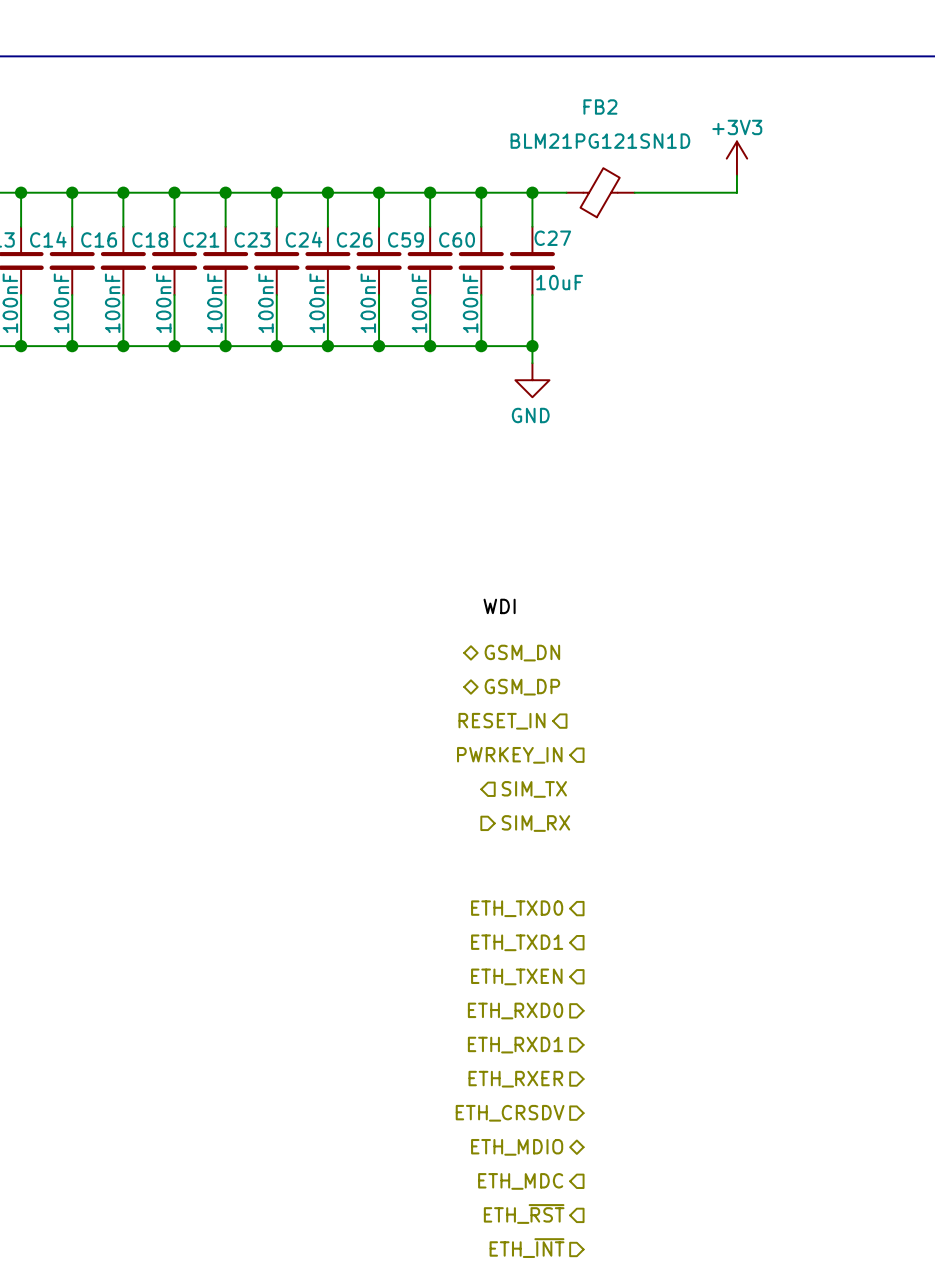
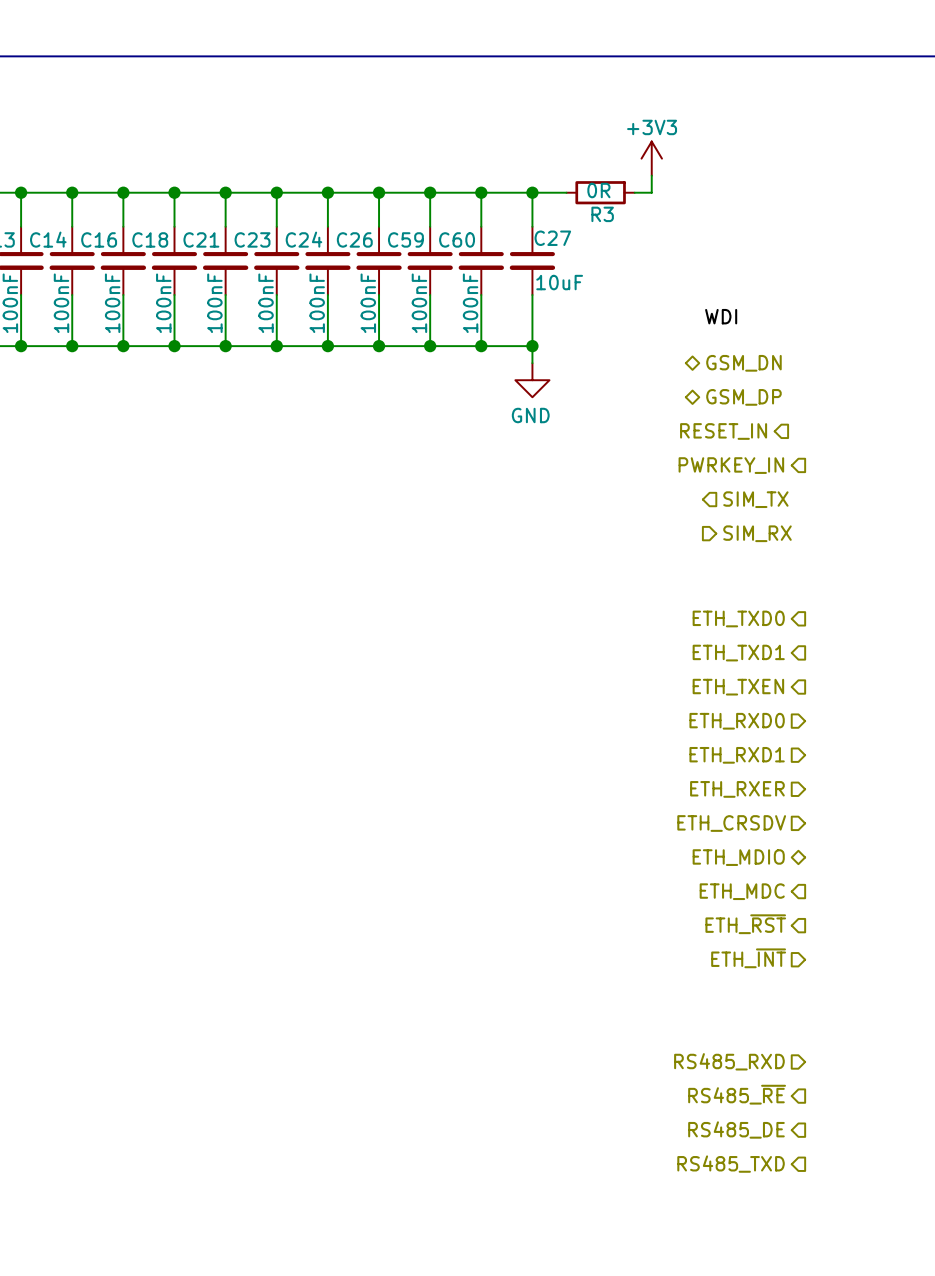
power symbol position: +3V3 (736, 158) -> +3V3 (651, 158)
wire: (736, 175) (736, 192) (651, 192) -> (651, 175) (651, 192)
FB2: BLM21PG121SN1D (600, 192) -> none
R3: none -> 0R (600, 192)
label: none -> WDI (721, 316)
hierarchical label: none -> GSM_DN (743, 363)
hierarchical label: none -> GSM_DP (743, 397)
hierarchical label: none -> RESET_IN (723, 431)
hierarchical label: none -> PWRKEY_IN (731, 465)
hierarchical label: none -> SIM_TX (755, 499)
hierarchical label: none -> SIM_RX (757, 533)
label: WDI (499, 606) -> none
hierarchical label: none -> ETH_TXD0 (738, 618)
hierarchical label: GSM_DN (522, 653) -> none
hierarchical label: none -> ETH_TXD1 (738, 653)
hierarchical label: GSM_DP (522, 687) -> none
hierarchical label: none -> ETH_TXEN (738, 687)
hierarchical label: RESET_IN (502, 721) -> none
hierarchical label: none -> ETH_RXD0 (737, 721)
hierarchical label: PWRKEY_IN (509, 755) -> none
hierarchical label: none -> ETH_RXD1 (737, 755)
hierarchical label: SIM_TX (534, 789) -> none
hierarchical label: none -> ETH_RXER (737, 789)
hierarchical label: SIM_RX (535, 823) -> none
hierarchical label: none -> ETH_CRSDV (731, 823)
hierarchical label: none -> ETH_MDIO (738, 857)
hierarchical label: none -> ETH_MDC (742, 891)
hierarchical label: ETH_TXD0 (517, 908) -> none
hierarchical label: none -> ETH_~{RST} (745, 924)
hierarchical label: ETH_TXD1 (517, 942) -> none
hierarchical label: none -> ETH_~{INT} (748, 958)
hierarchical label: ETH_TXEN (516, 976) -> none
hierarchical label: ETH_RXD0 (515, 1010) -> none
hierarchical label: ETH_RXD1 (515, 1045) -> none
hierarchical label: none -> RS485_RXD (729, 1061)
hierarchical label: ETH_RXER (515, 1079) -> none
hierarchical label: none -> RS485_~{RE} (737, 1094)
hierarchical label: ETH_CRSDV (510, 1113) -> none
hierarchical label: none -> RS485_DE (736, 1129)
hierarchical label: ETH_MDIO (517, 1147) -> none
hierarchical label: none -> RS485_TXD (731, 1164)
hierarchical label: ETH_MDC (520, 1181) -> none
hierarchical label: ETH_~{RST} (524, 1213) -> none
hierarchical label: ETH_~{INT} (527, 1248) -> none

